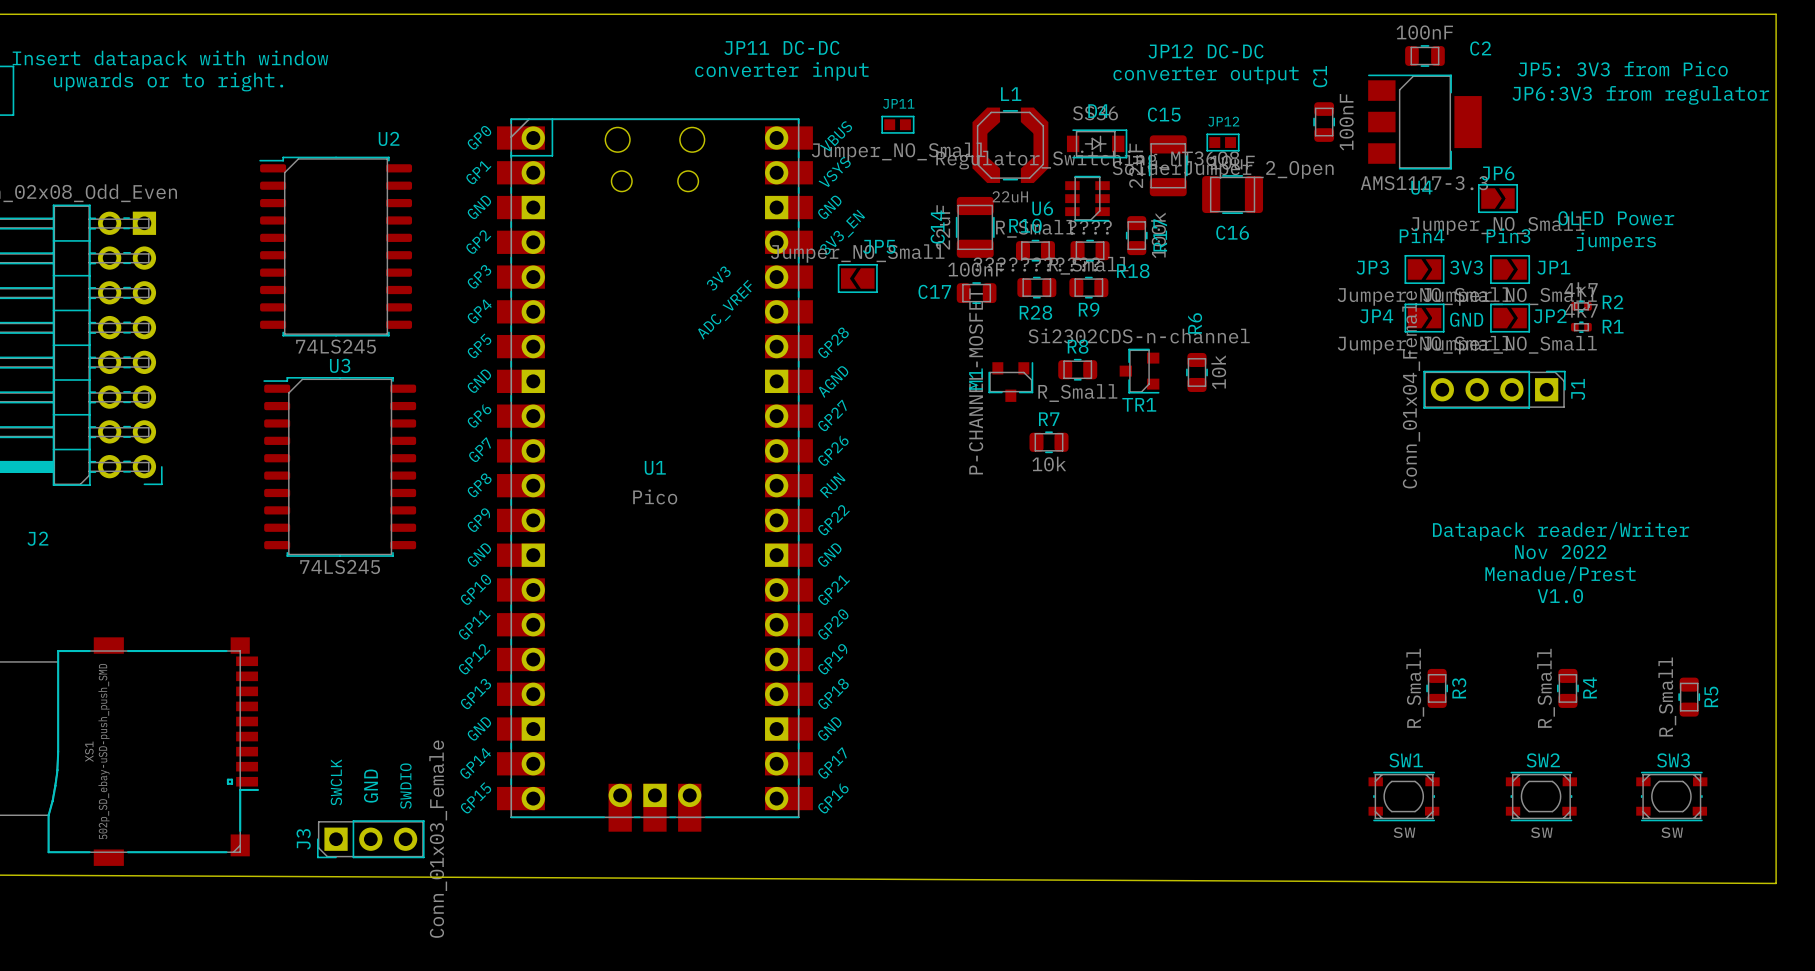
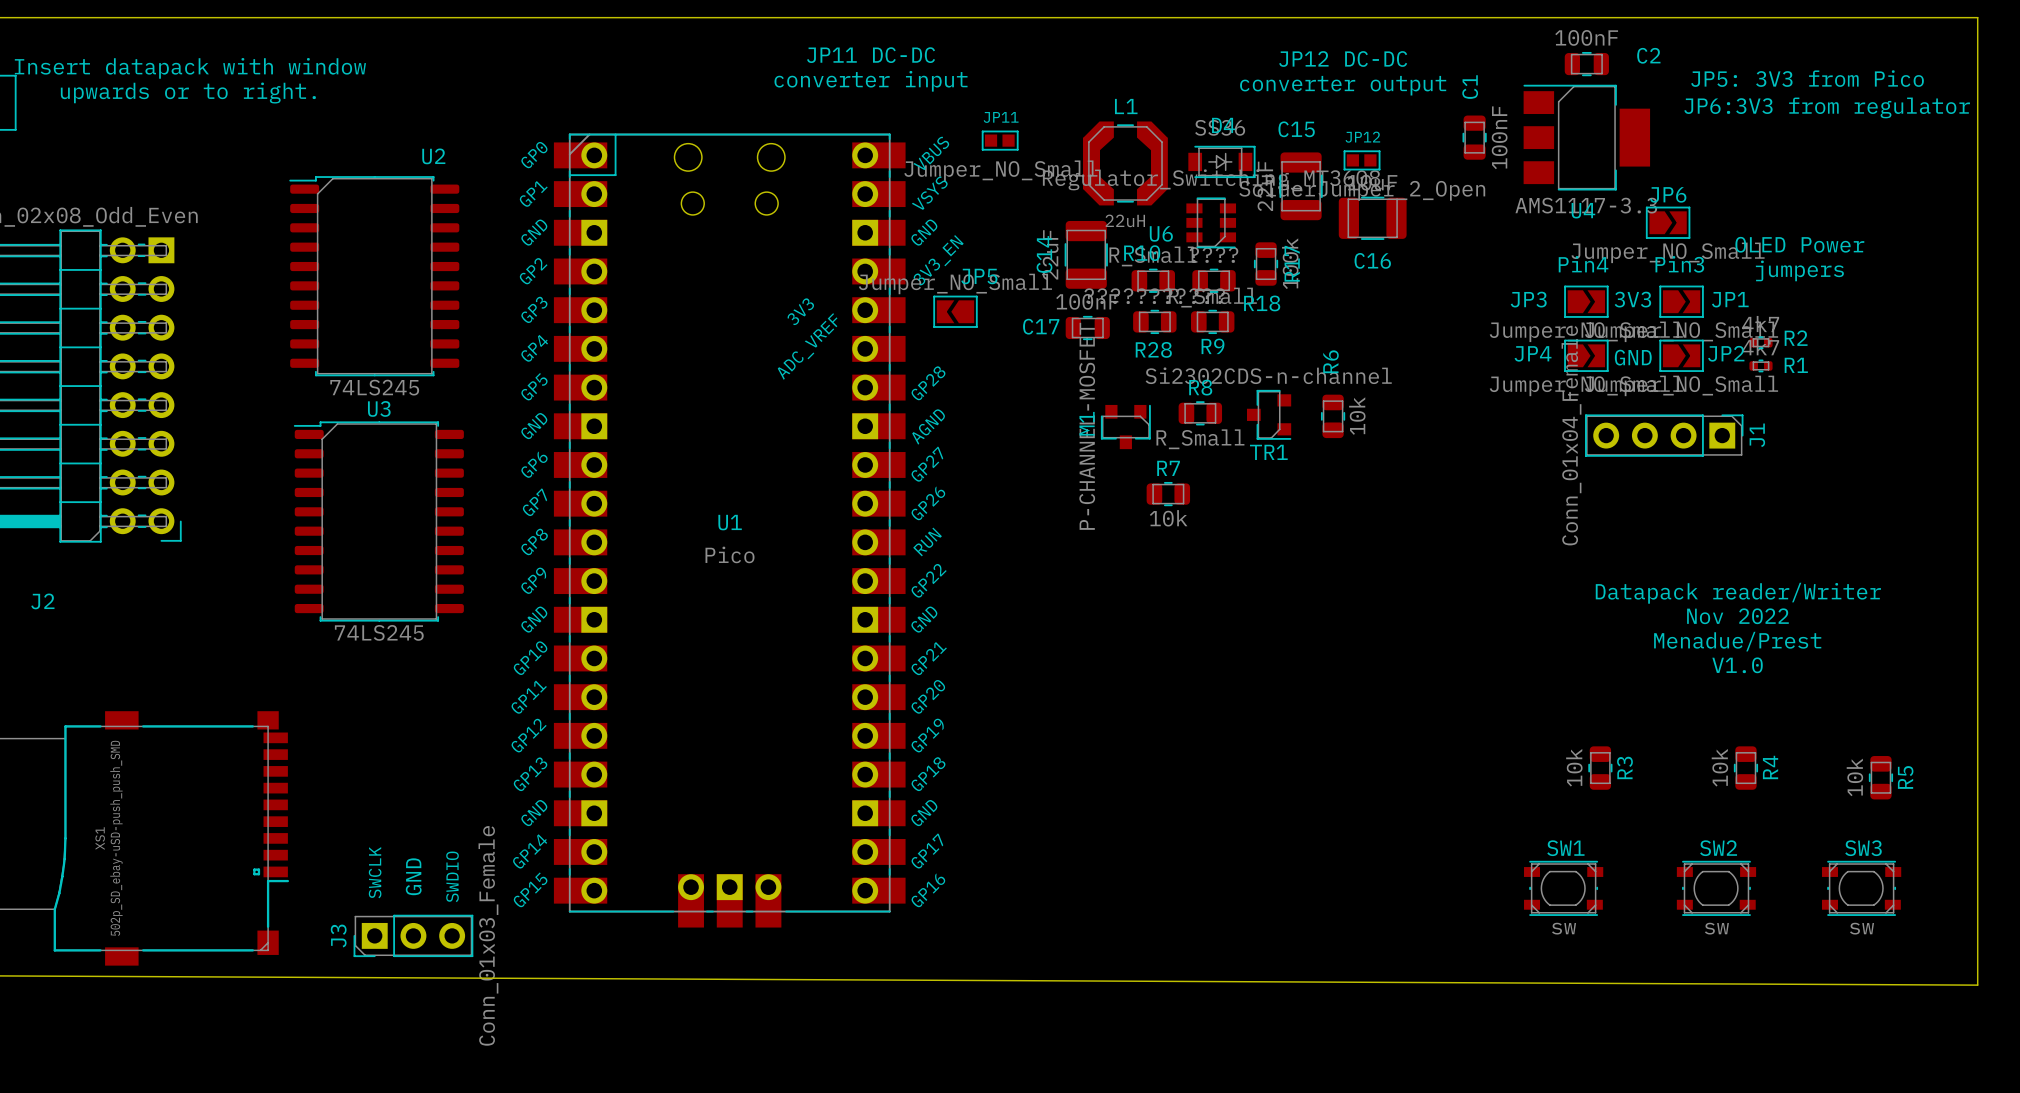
R3 value: R_Small (1415, 688) -> 10k (1574, 767)
R4 value: R_Small (1546, 688) -> 10k (1719, 767)
R5 value: R_Small (1667, 697) -> 10k (1854, 777)

